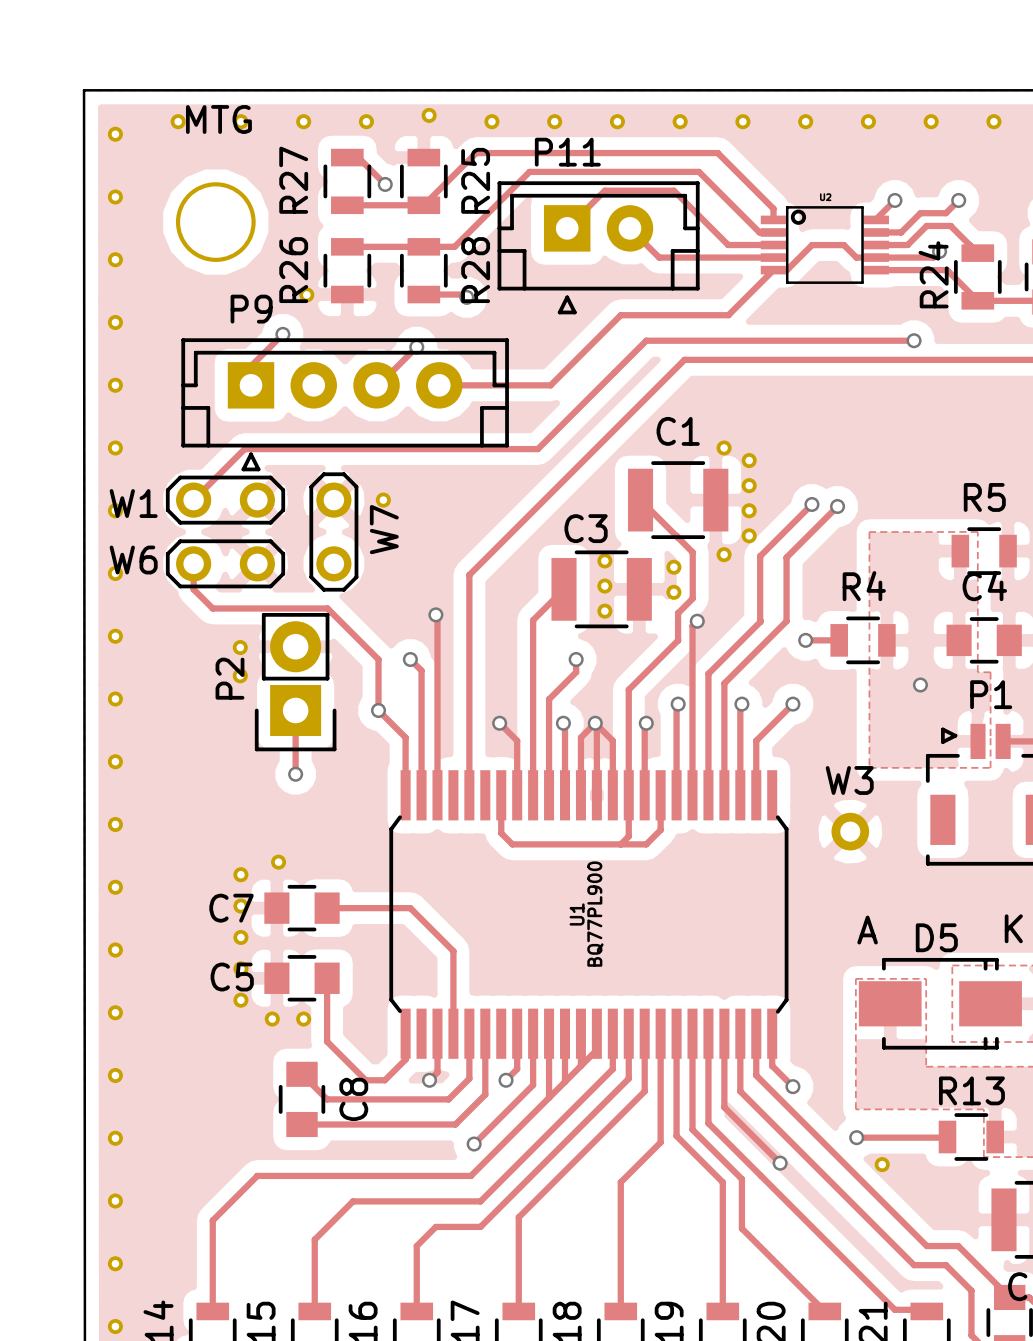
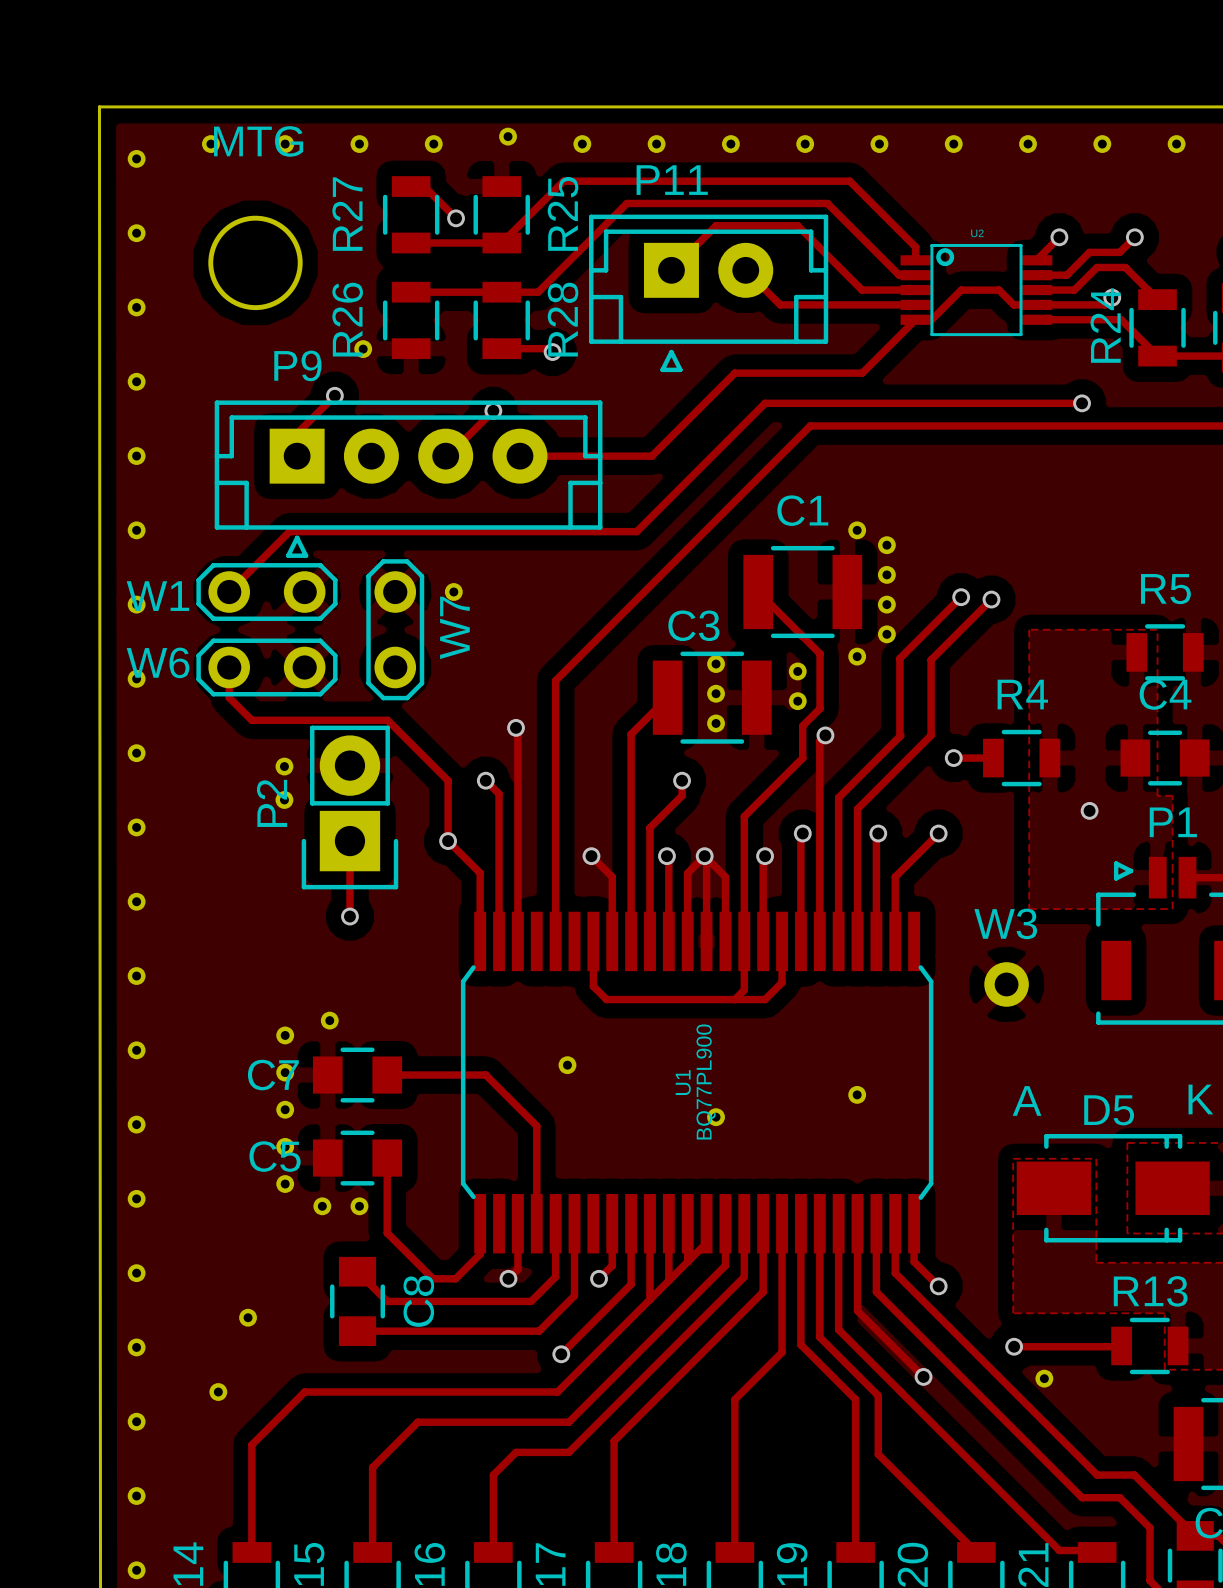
part: none -> (567, 1065)
part: none -> (857, 1094)
part: none -> (716, 1117)
part: none -> (248, 1317)
part: none -> (218, 1392)

